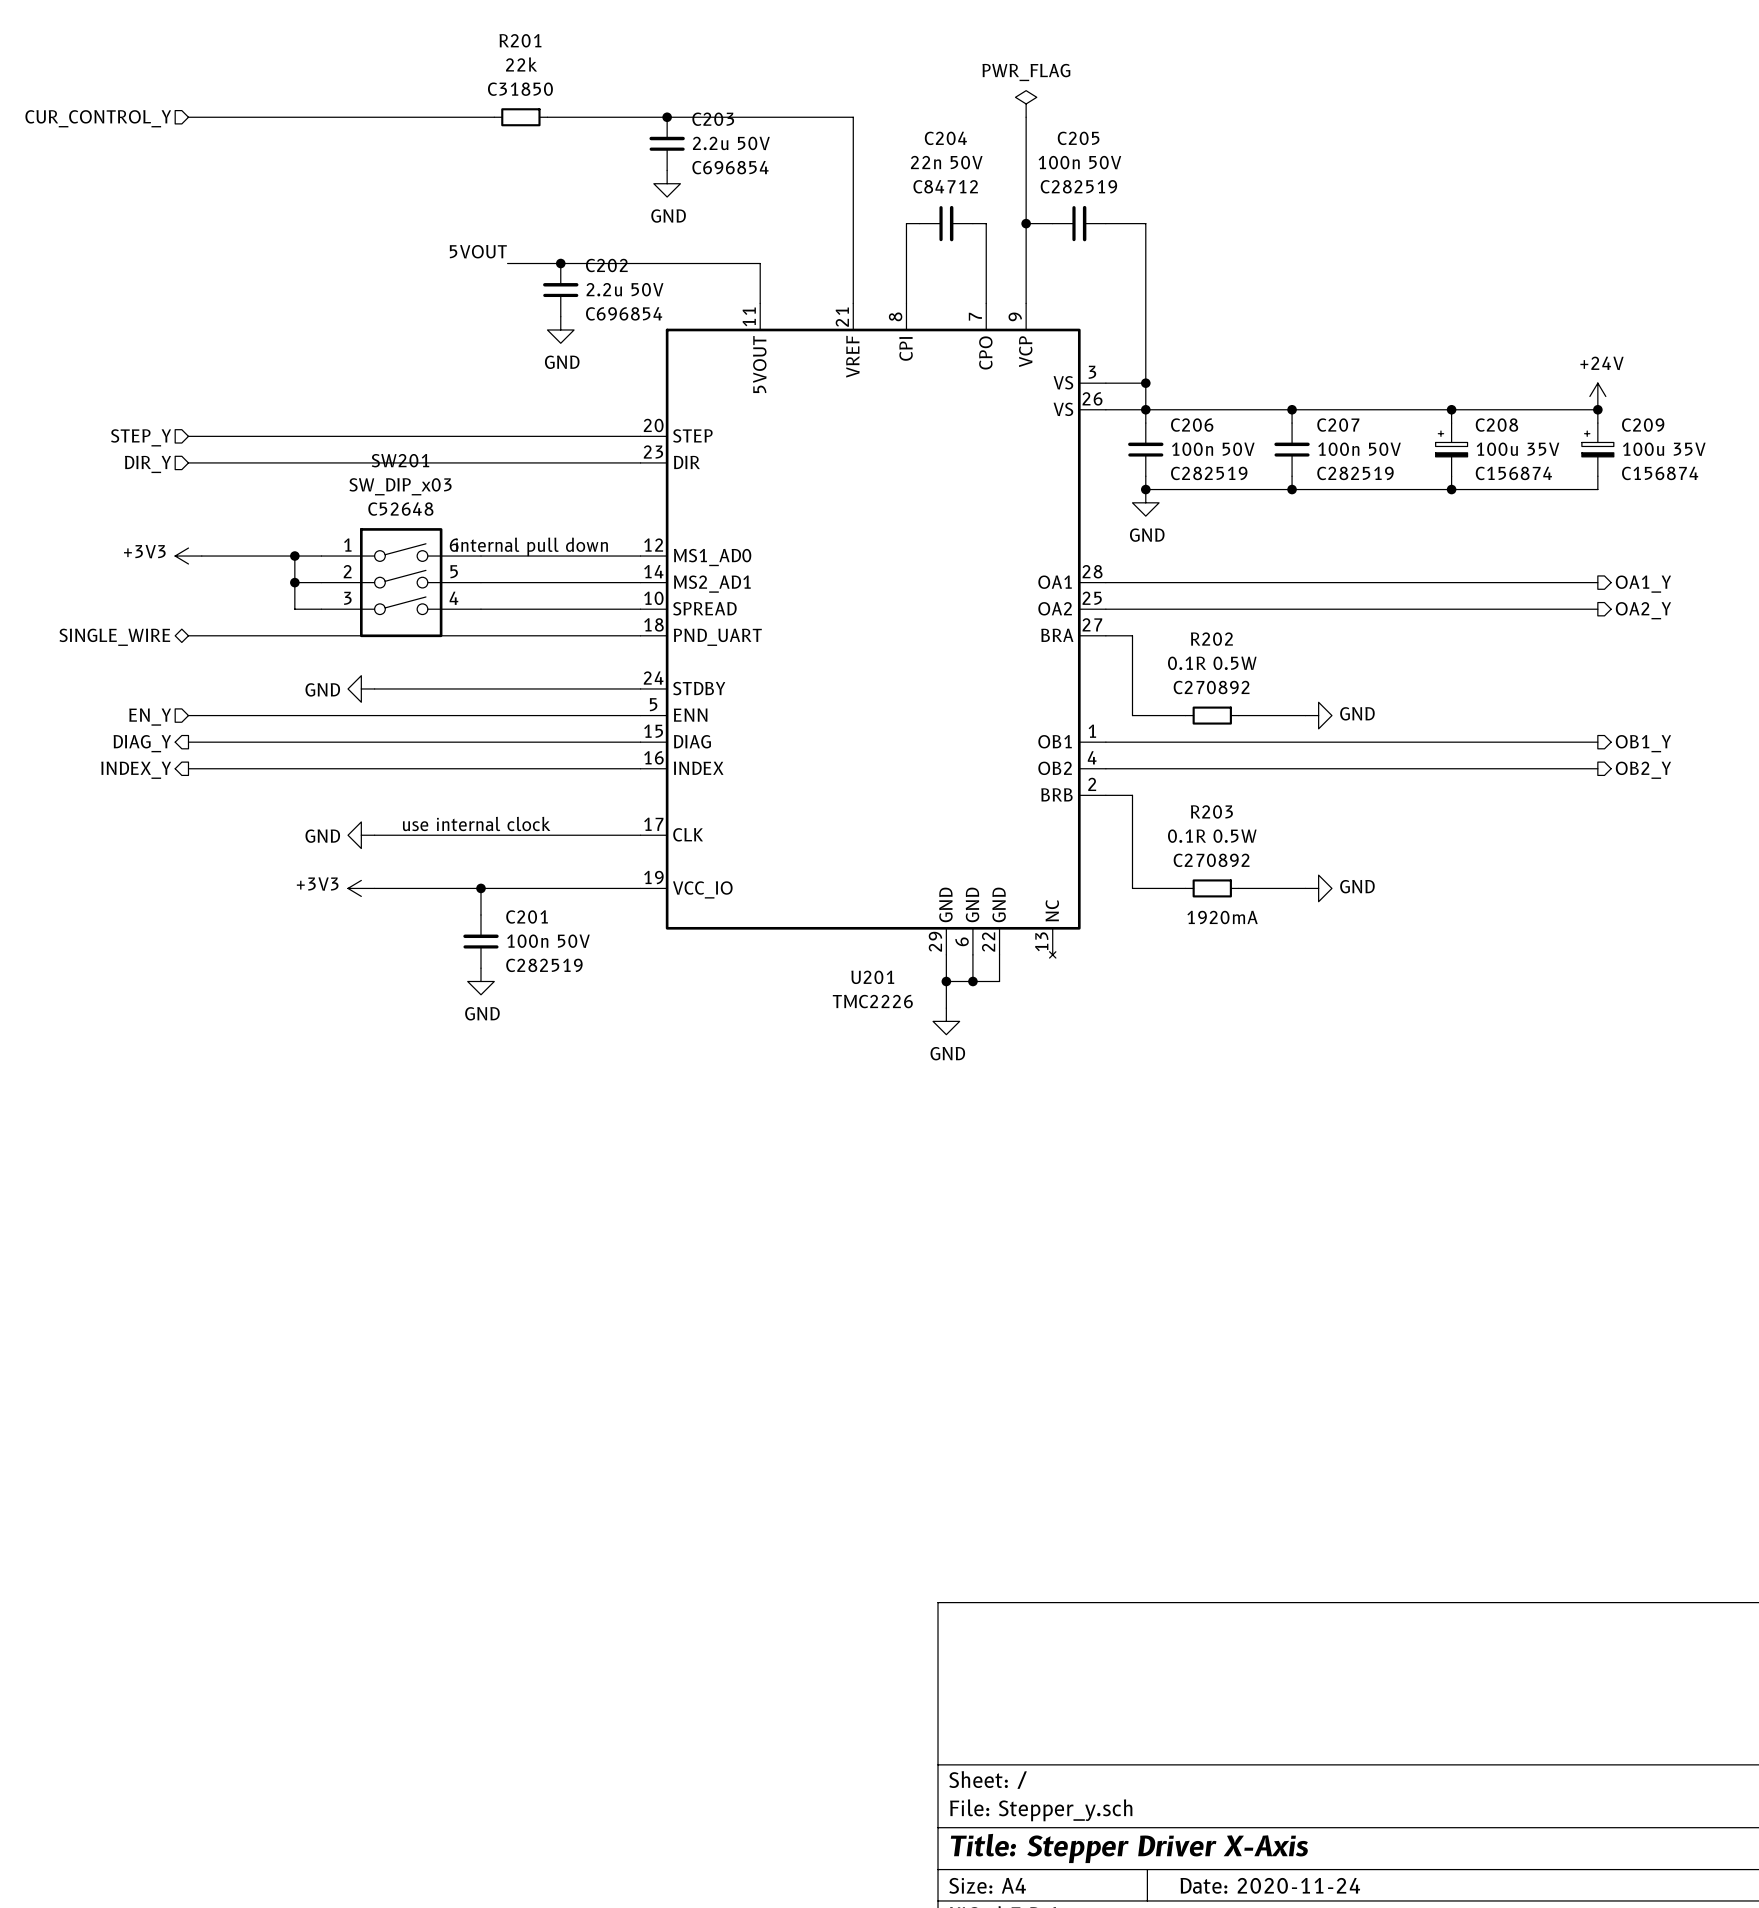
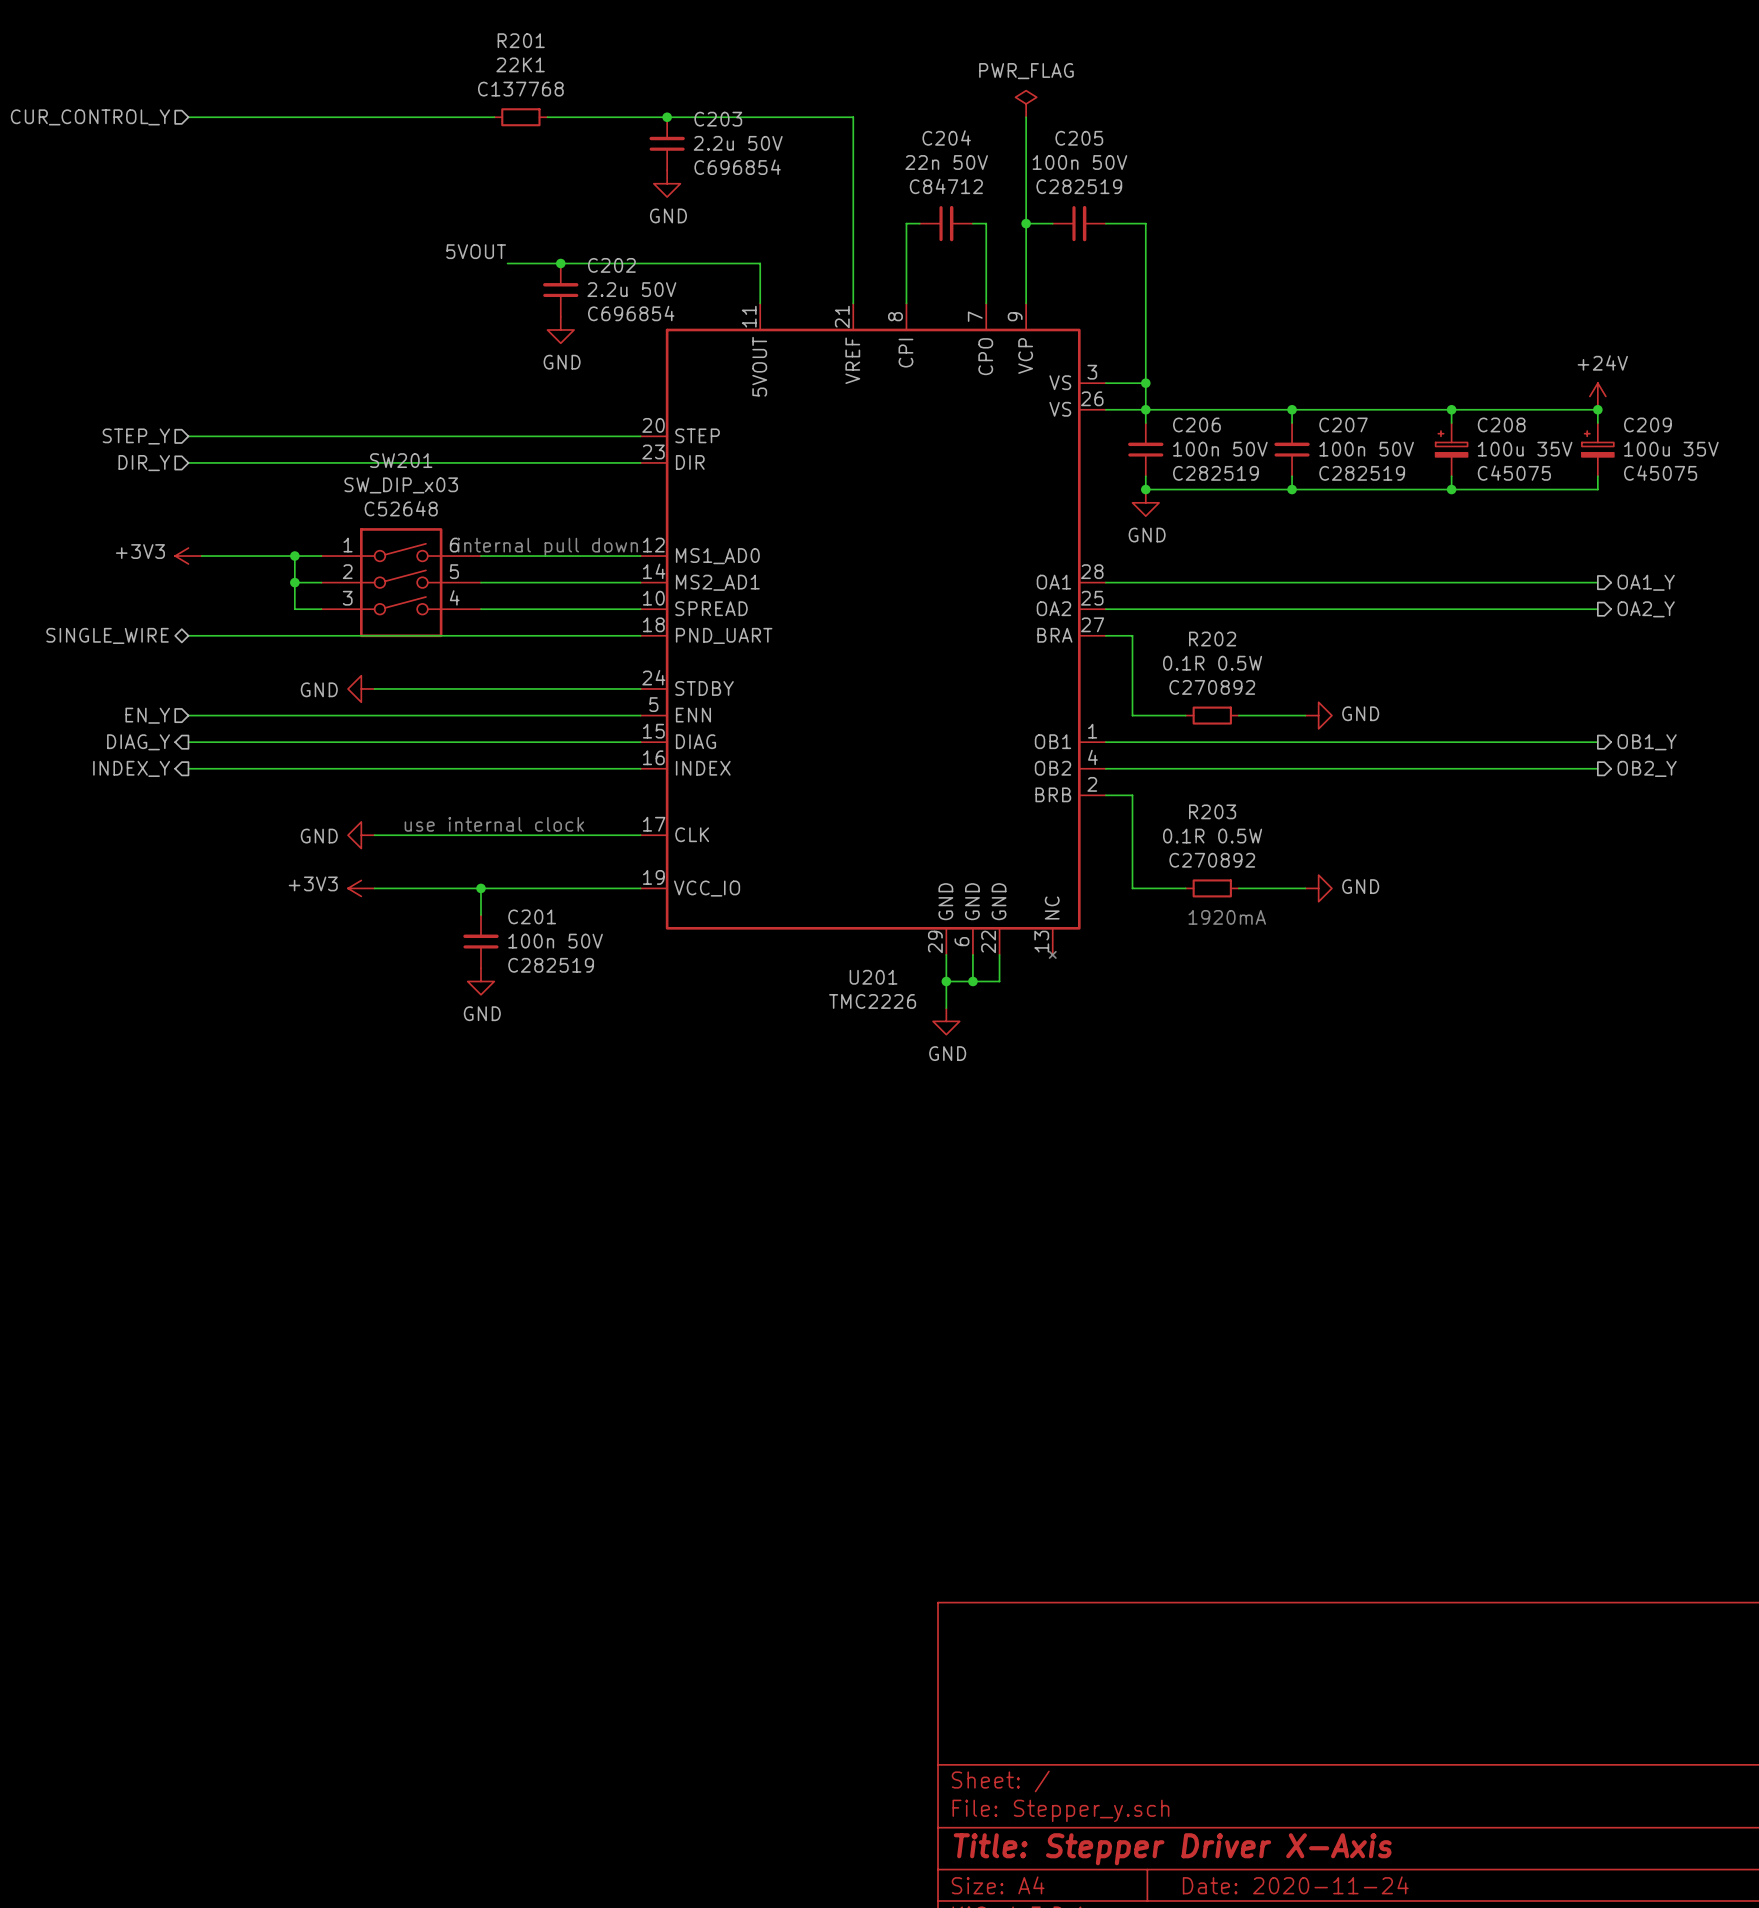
R201 value: 22k (521, 64) -> 22K1 (520, 64)
R201 text: C31850 (520, 89) -> C137768 (520, 89)
C208 text: C156874 (1513, 473) -> C45075 (1514, 473)
C209 text: C156874 (1660, 473) -> C45075 (1660, 473)

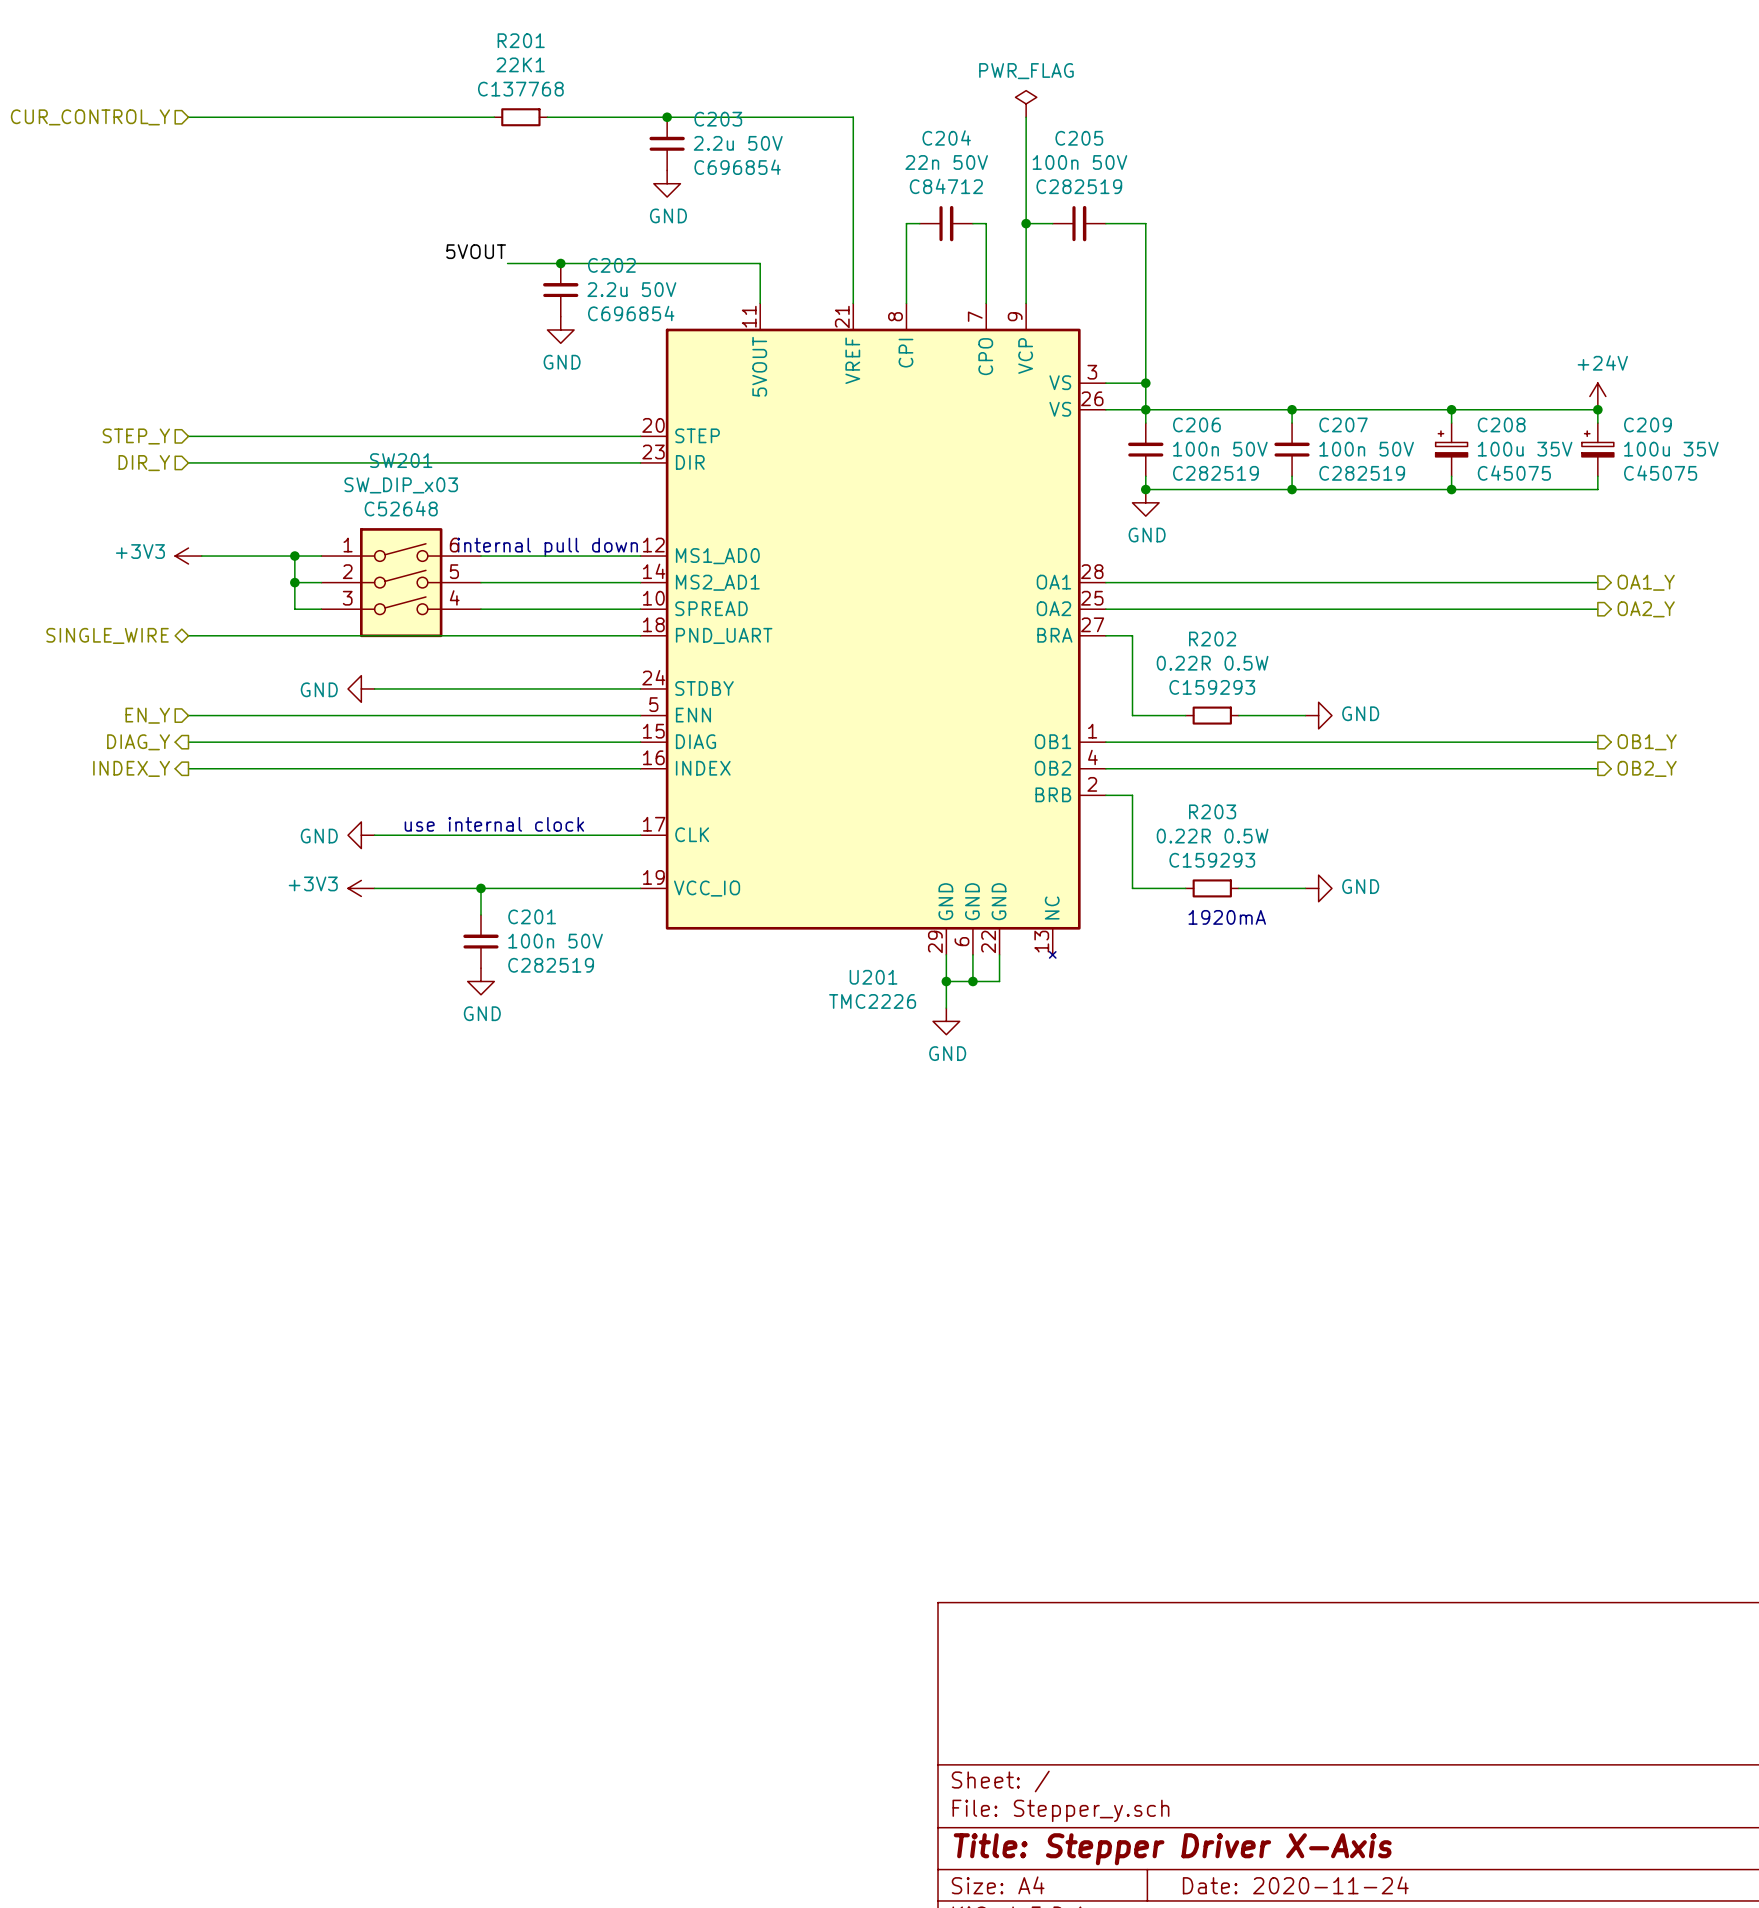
R202 value: 0.1R 0.5W (1212, 663) -> 0.22R 0.5W (1212, 663)
R202 text: C270892 (1212, 687) -> C159293 (1212, 687)
R203 value: 0.1R 0.5W (1212, 836) -> 0.22R 0.5W (1212, 836)
R203 text: C270892 (1212, 860) -> C159293 (1212, 860)

